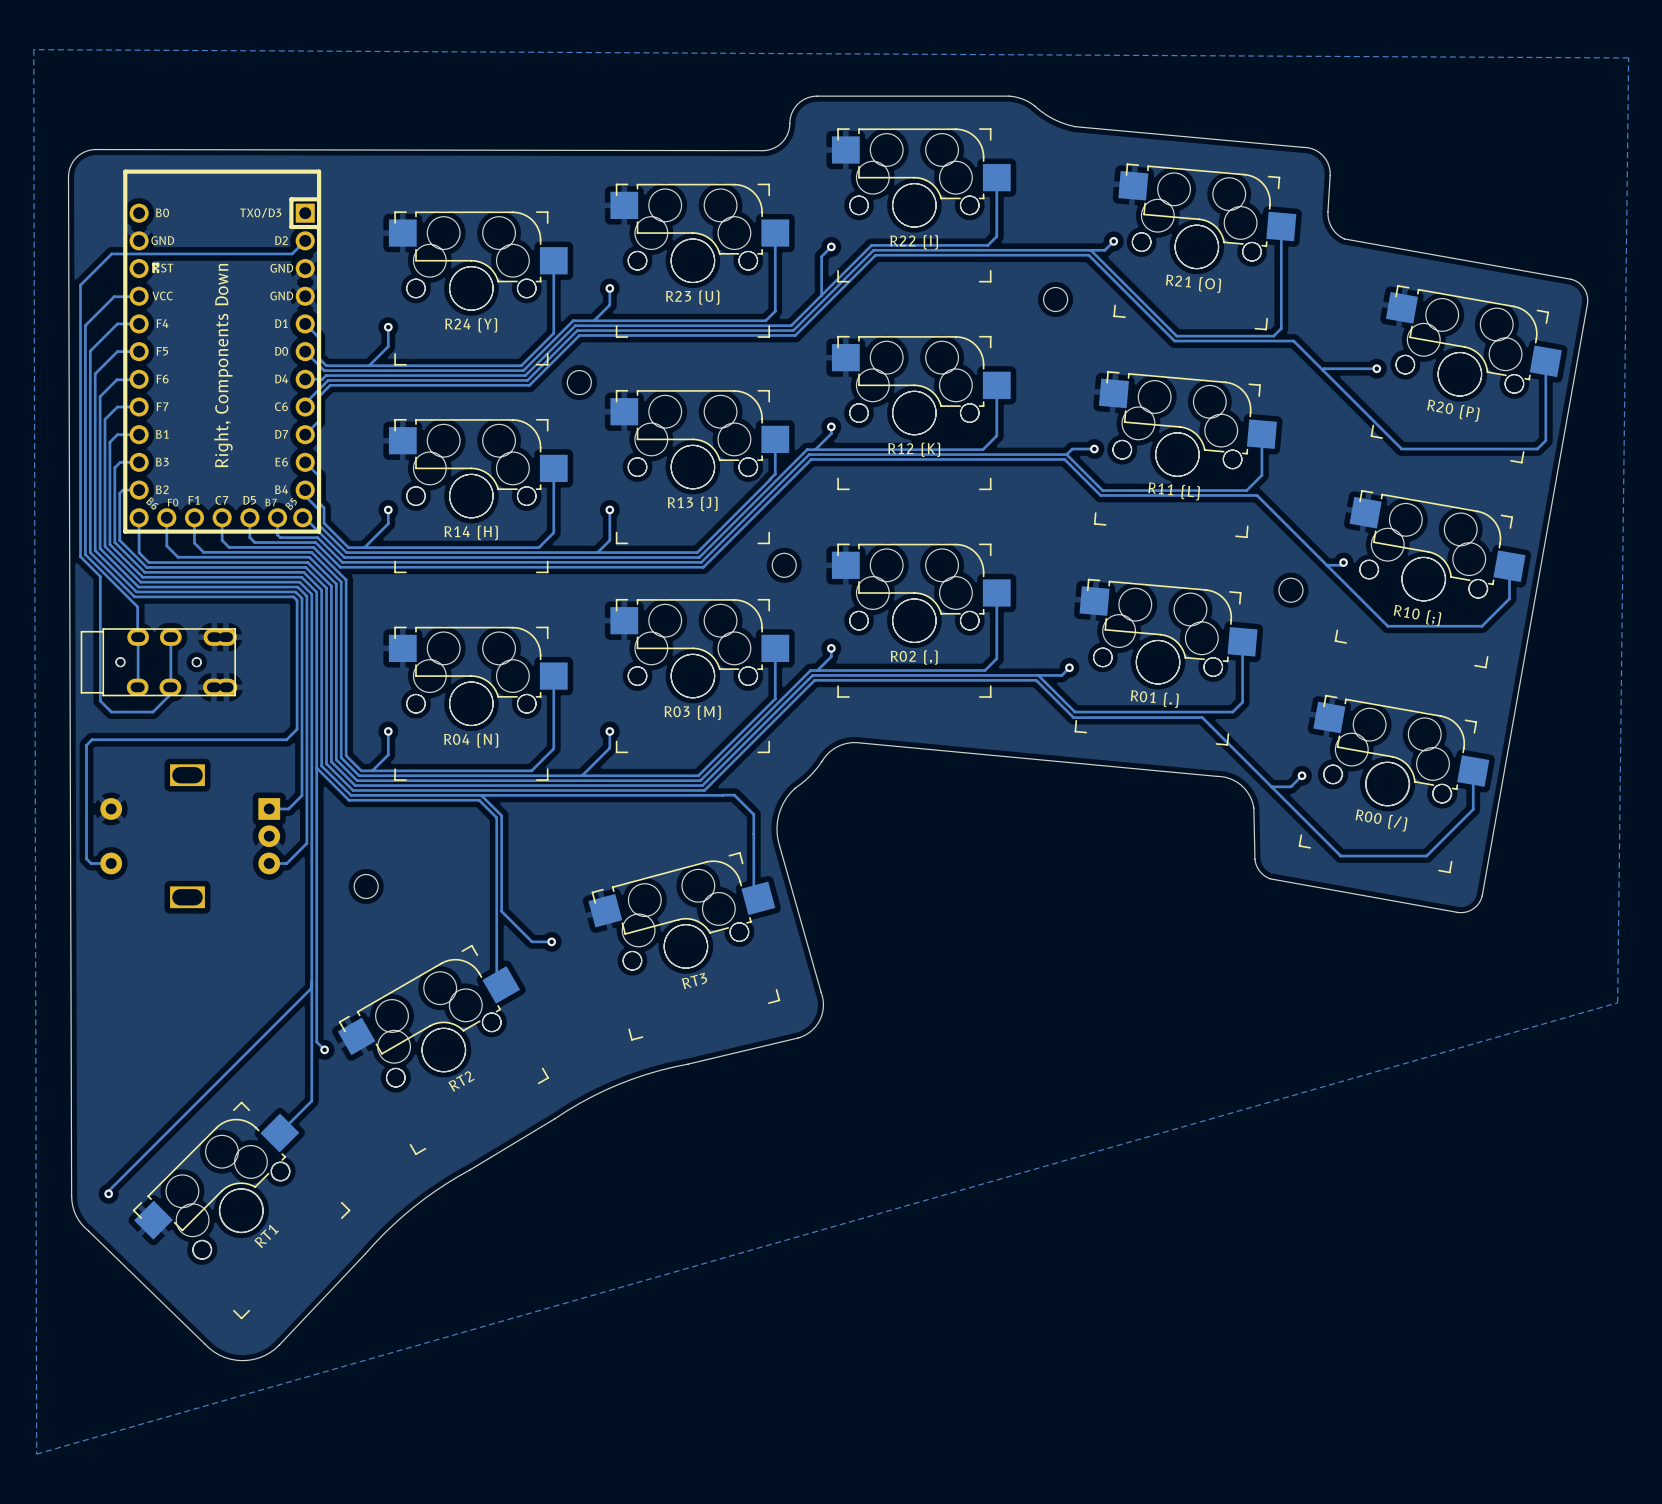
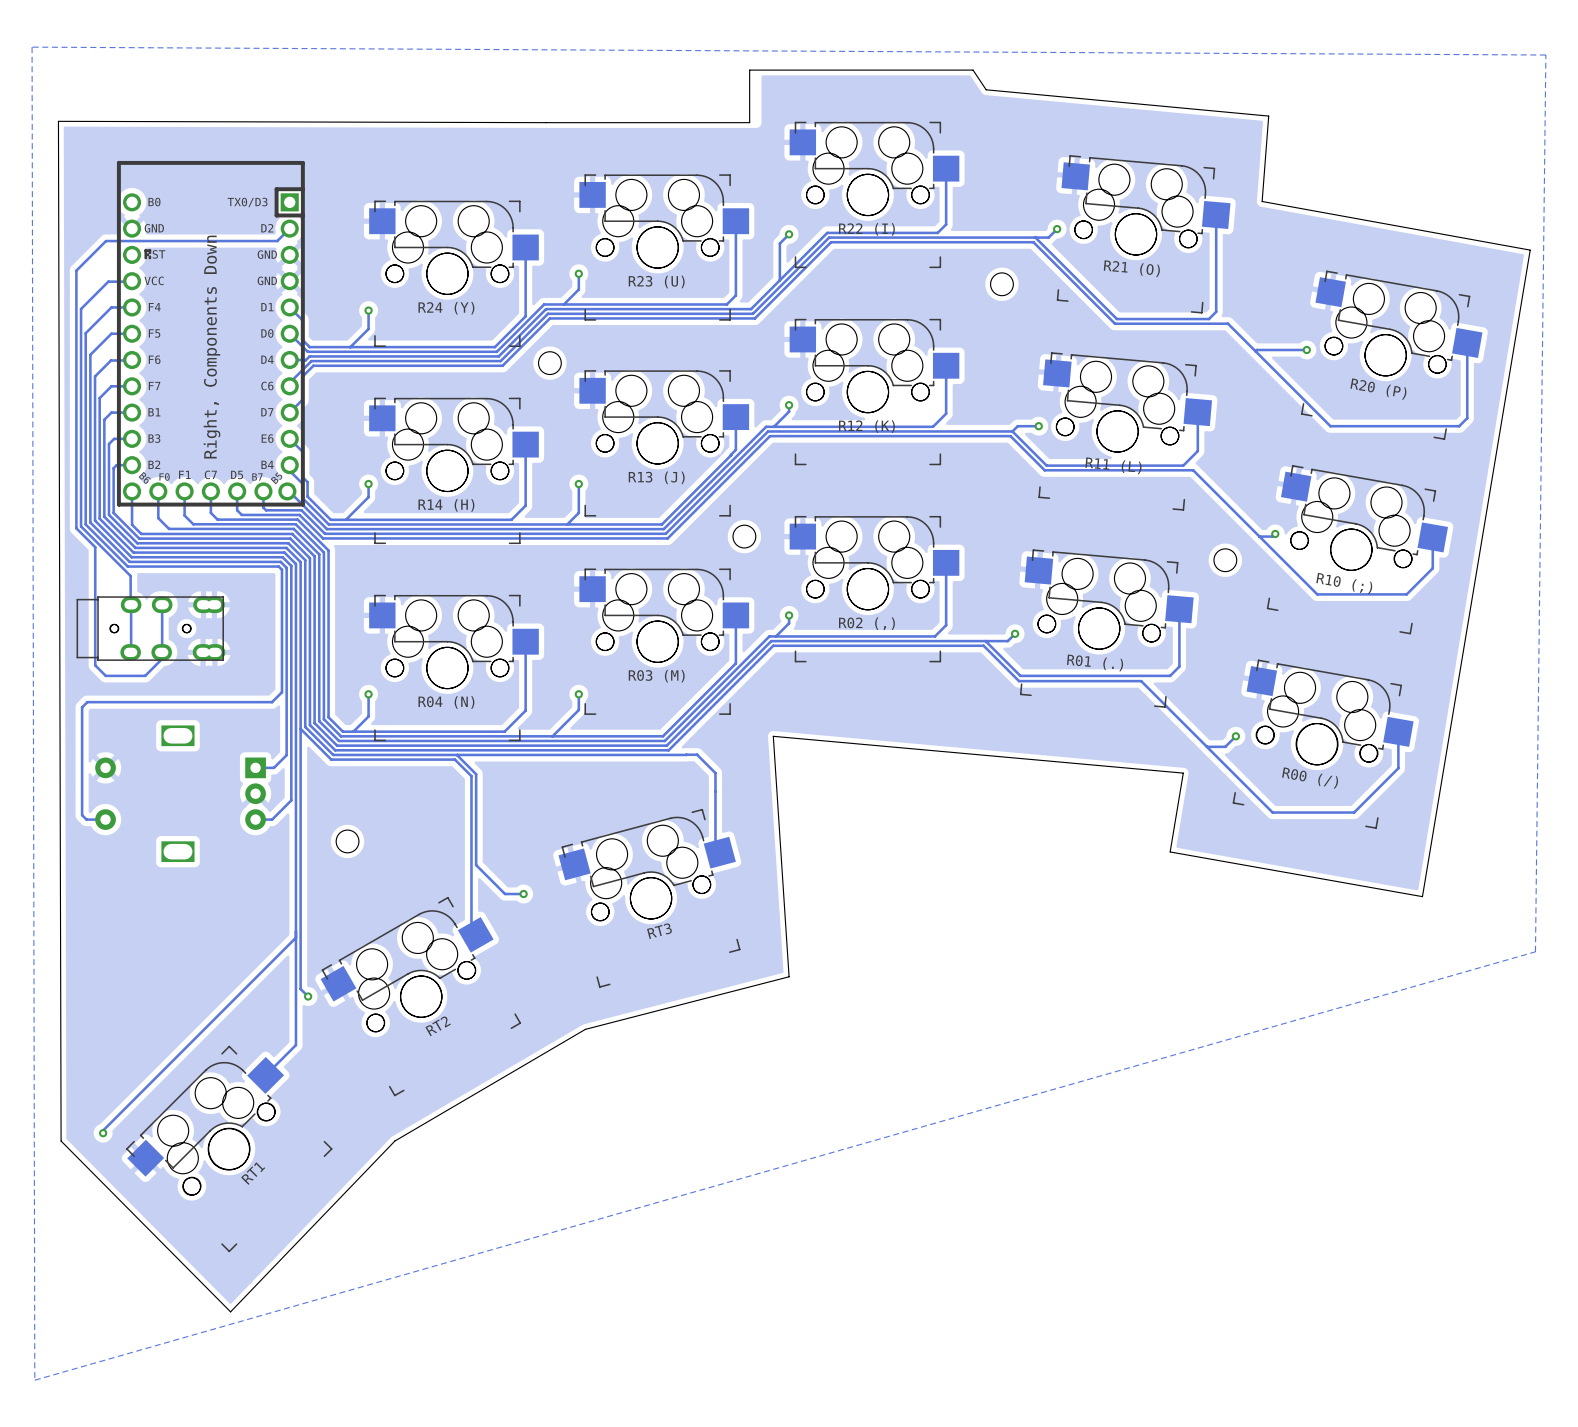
board edge: (1009, 96) (811, 96) (802, 100) (794, 108) (788, 132) (783, 140) (774, 147) (765, 150) (95, 149) (83, 152) (72, 162) (68, 176) (71, 1201) (76, 1215) (84, 1227) (214, 1351) (230, 1359) (242, 1360) (253, 1359) (270, 1352) (383, 1234) (413, 1207) (446, 1183) (592, 1096) (645, 1074) (798, 1037) (812, 1030) (821, 1016) (823, 1000) (778, 840) (777, 821) (780, 808) (790, 792) (809, 776) (829, 751) (843, 744) (855, 742) (1225, 777) (1241, 785) (1251, 799) (1253, 807) (1255, 861) (1259, 871) (1267, 877) (1457, 912) (1470, 910) (1478, 903) (1482, 895) (1587, 304) (1587, 296) (1584, 288) (1578, 282) (1571, 279) (1344, 238) (1333, 230) (1328, 218) (1329, 166) (1322, 155) (1312, 148) (1075, 126) (1053, 119) (1027, 101) (1009, 96) -> (973, 70) (986, 89) (1268, 116) (1262, 201) (1530, 250) (1422, 896) (1170, 851) (1183, 773) (773, 736) (789, 976) (585, 1029) (394, 1141) (230, 1311) (61, 1141) (58, 121) (749, 122) (749, 70) (973, 70)

